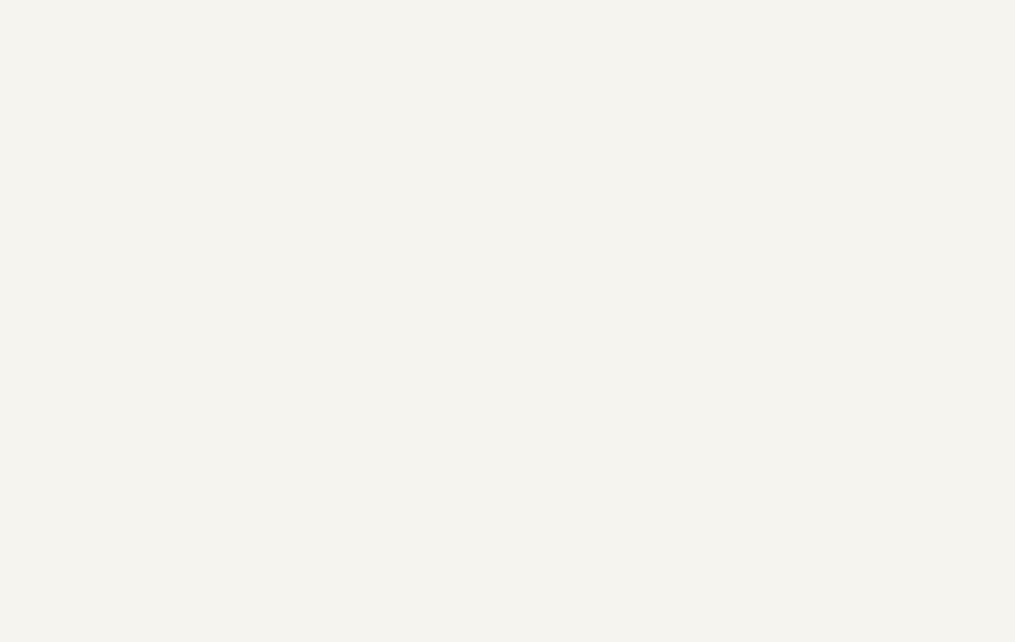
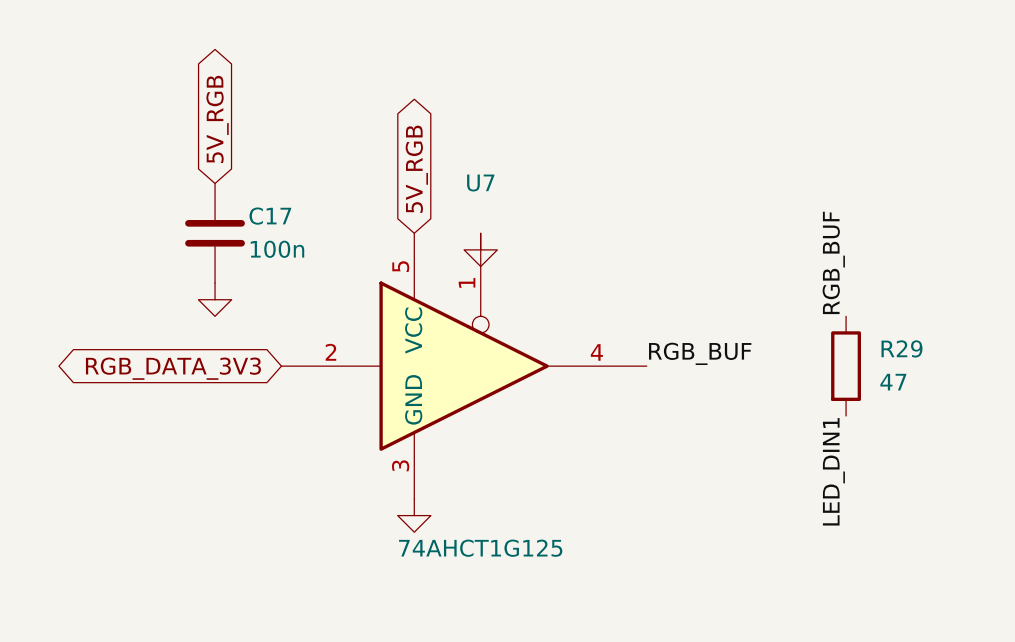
global label: none -> 5V_RGB (217, 119)
global label: none -> 5V_RGB (416, 169)
C17: none -> 100n (215, 233)
power symbol: none -> (480, 249)
label: none -> RGB_BUF (833, 262)
power symbol: none -> (215, 299)
label: none -> RGB_BUF (700, 353)
U7: none -> 74AHCT1G125 (464, 366)
R29: none -> 47 (846, 366)
global label: none -> RGB_DATA_3V3 (173, 368)
label: none -> LED_DIN1 (833, 471)
power symbol: none -> (414, 515)

